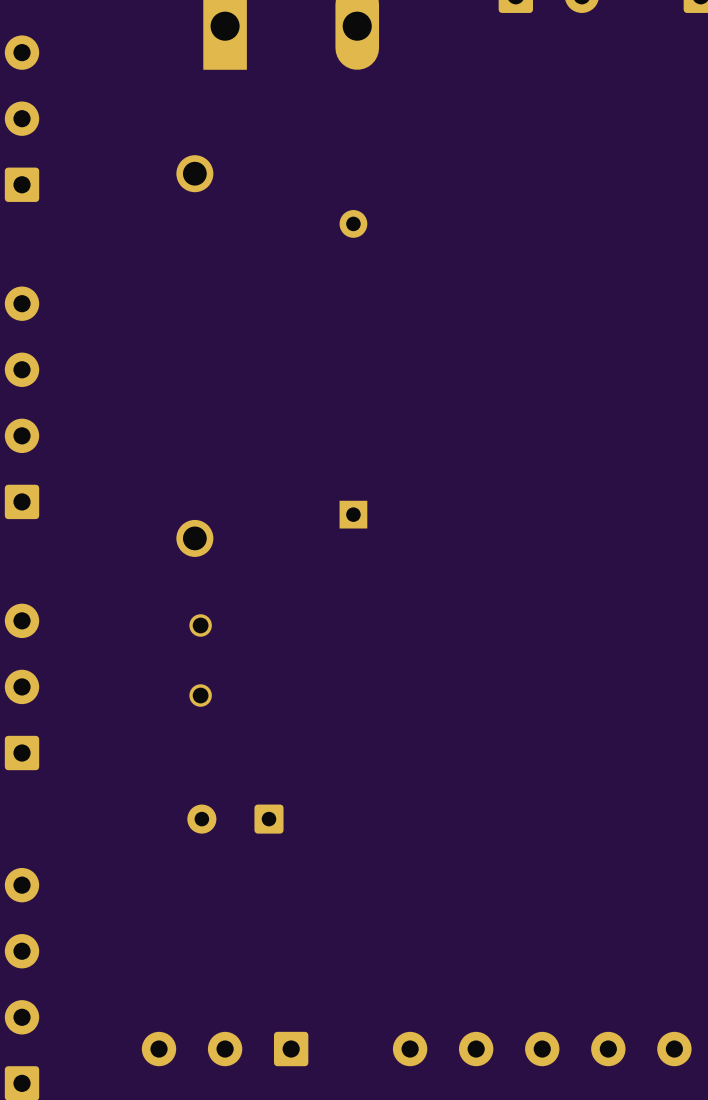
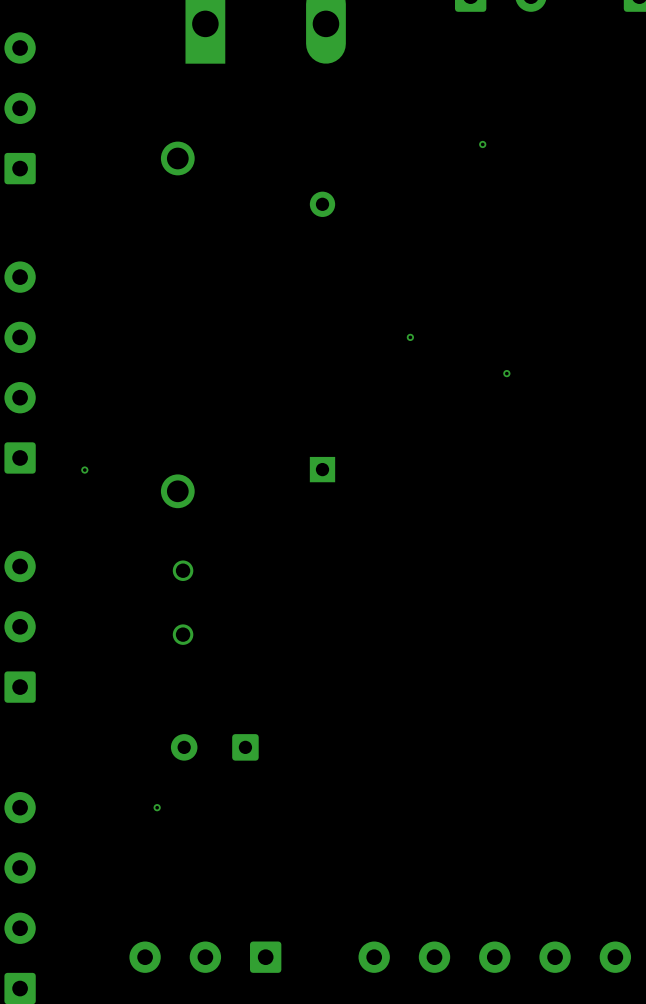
via: none -> (482, 144)
via: none -> (410, 337)
via: none -> (506, 373)
via: none -> (84, 470)
via: none -> (157, 807)

